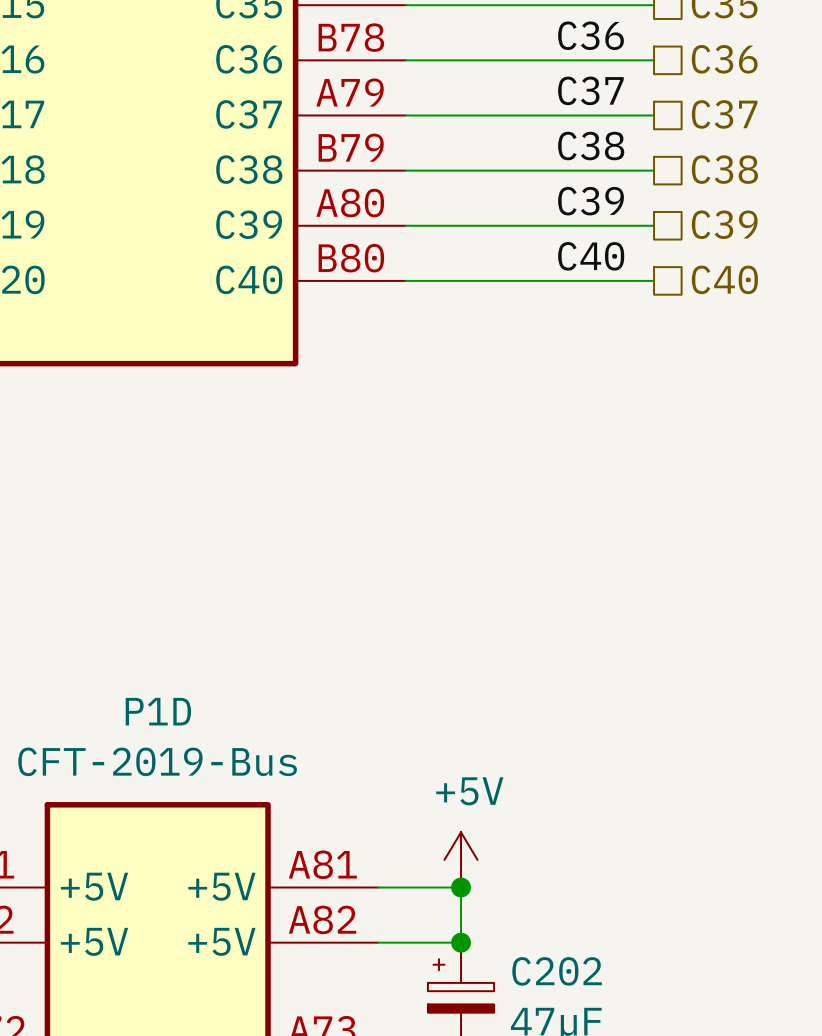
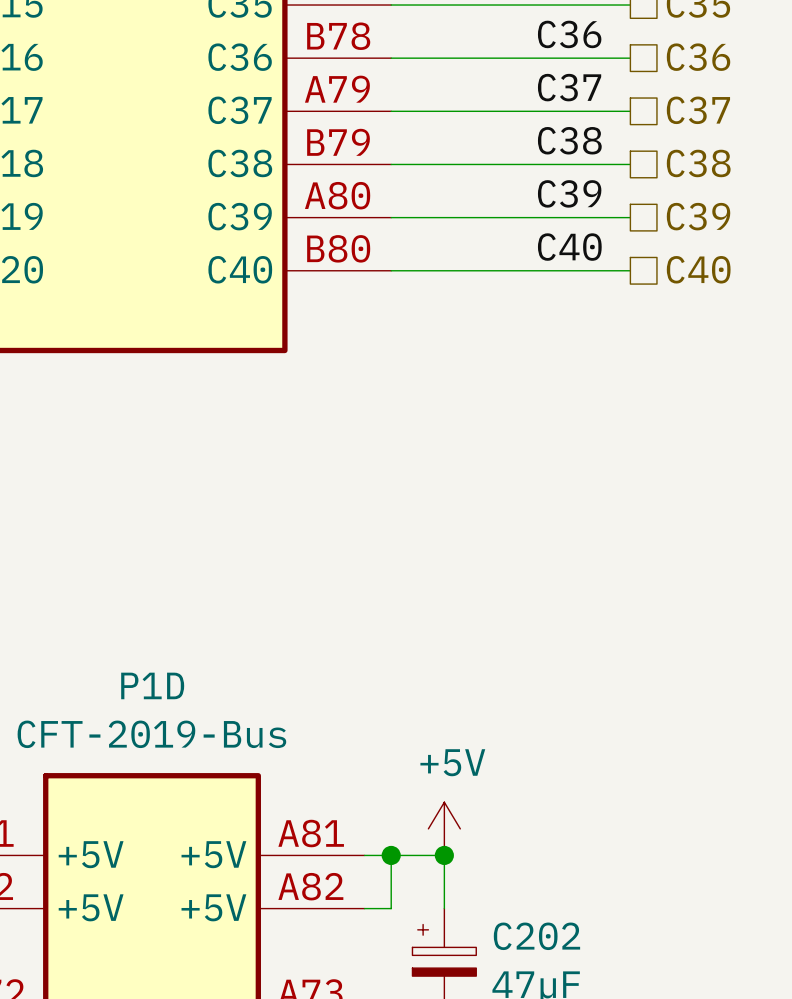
wire: (405, 942) (461, 942) -> (391, 908) (391, 855)
junction position: (461, 942) -> (391, 855)

